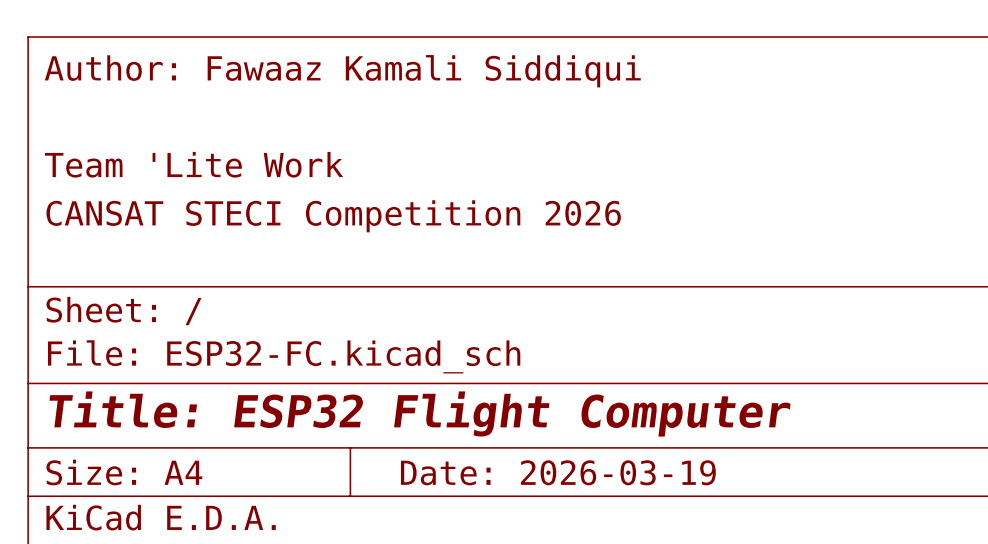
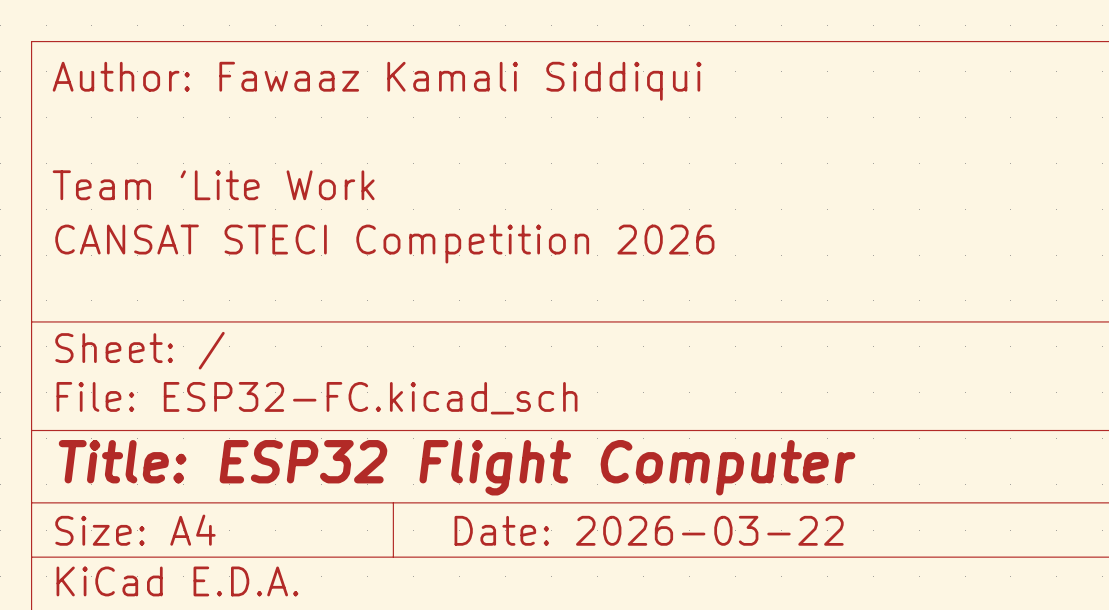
title block: Date: 2026-03-19 (558, 472) -> Date: 2026-03-22 (649, 530)

